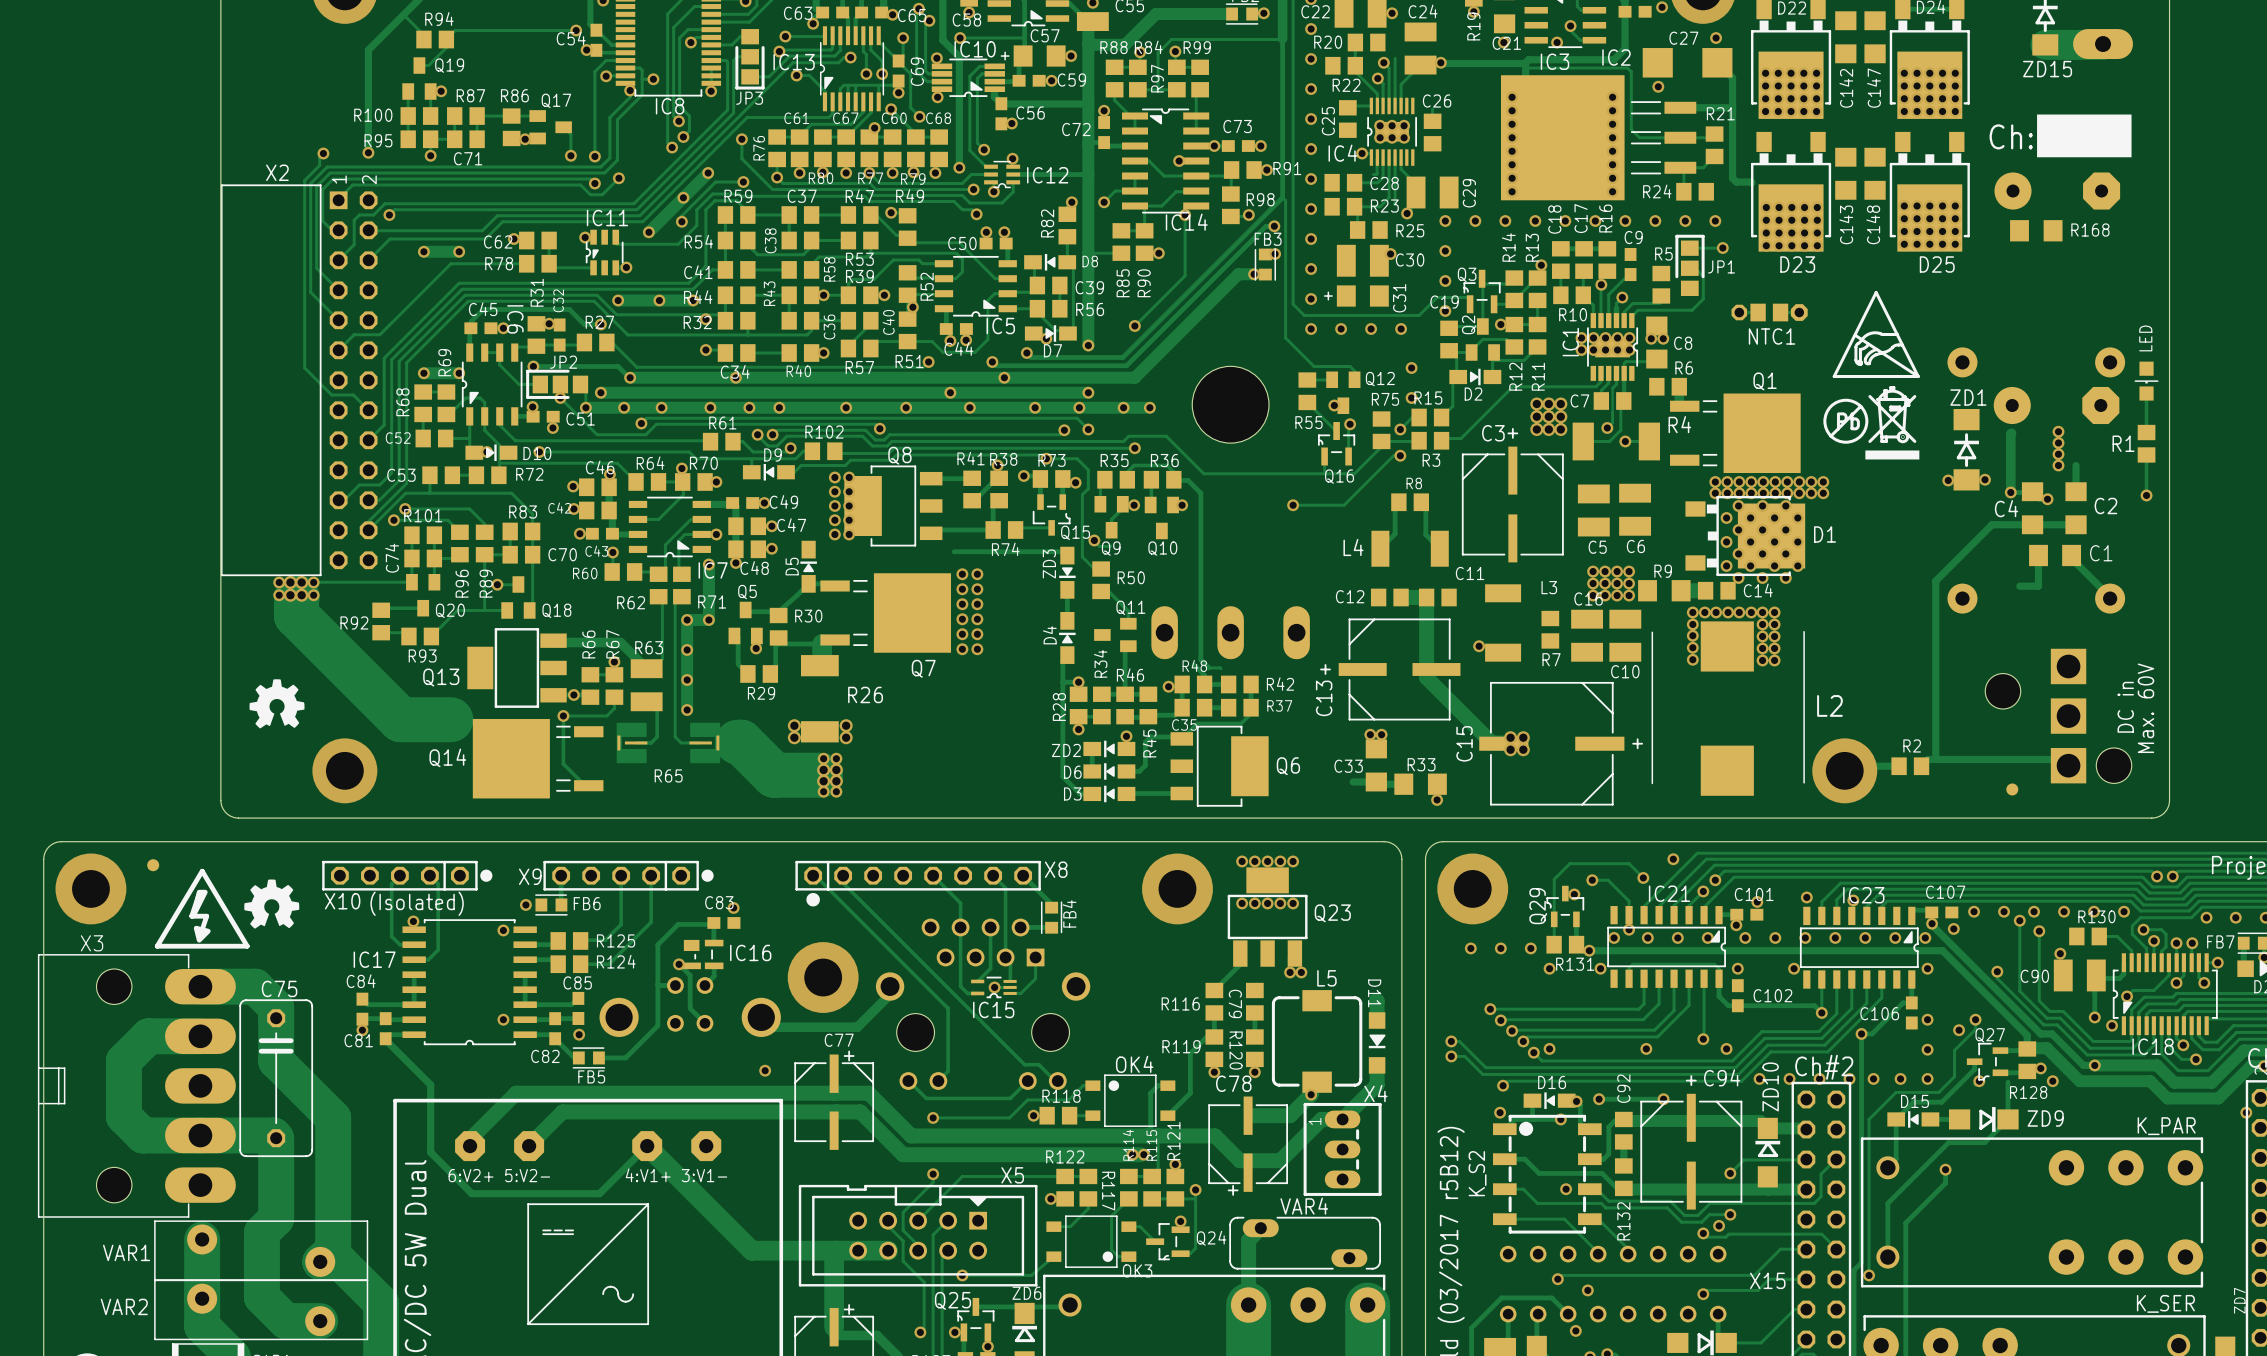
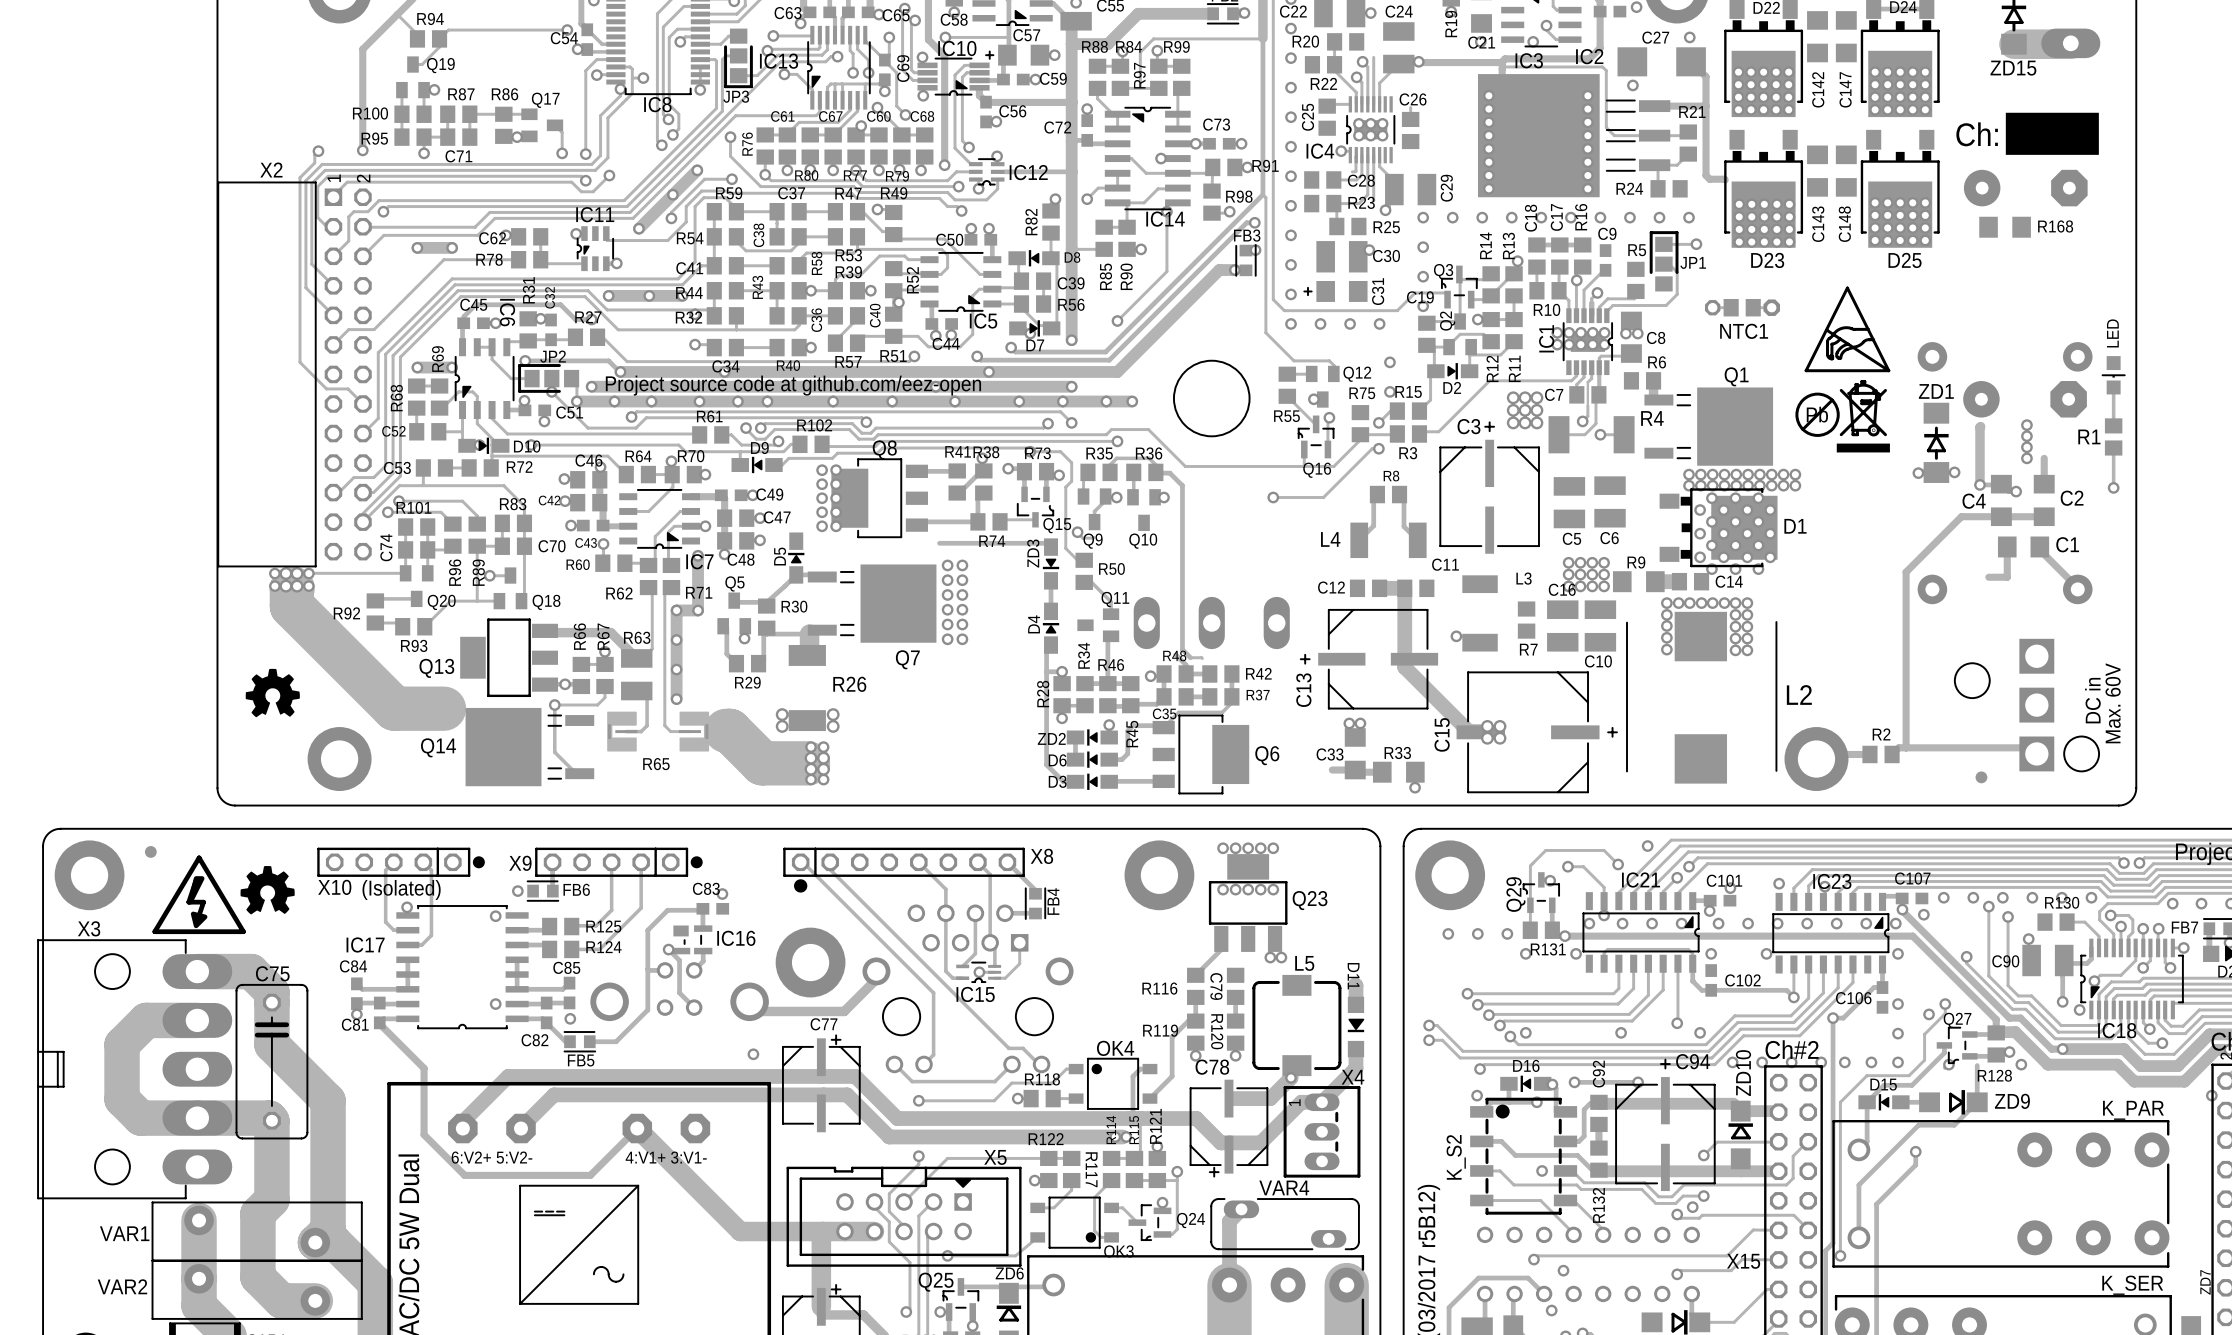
text: none -> Project source code at github.com/eez-open (793, 385)

